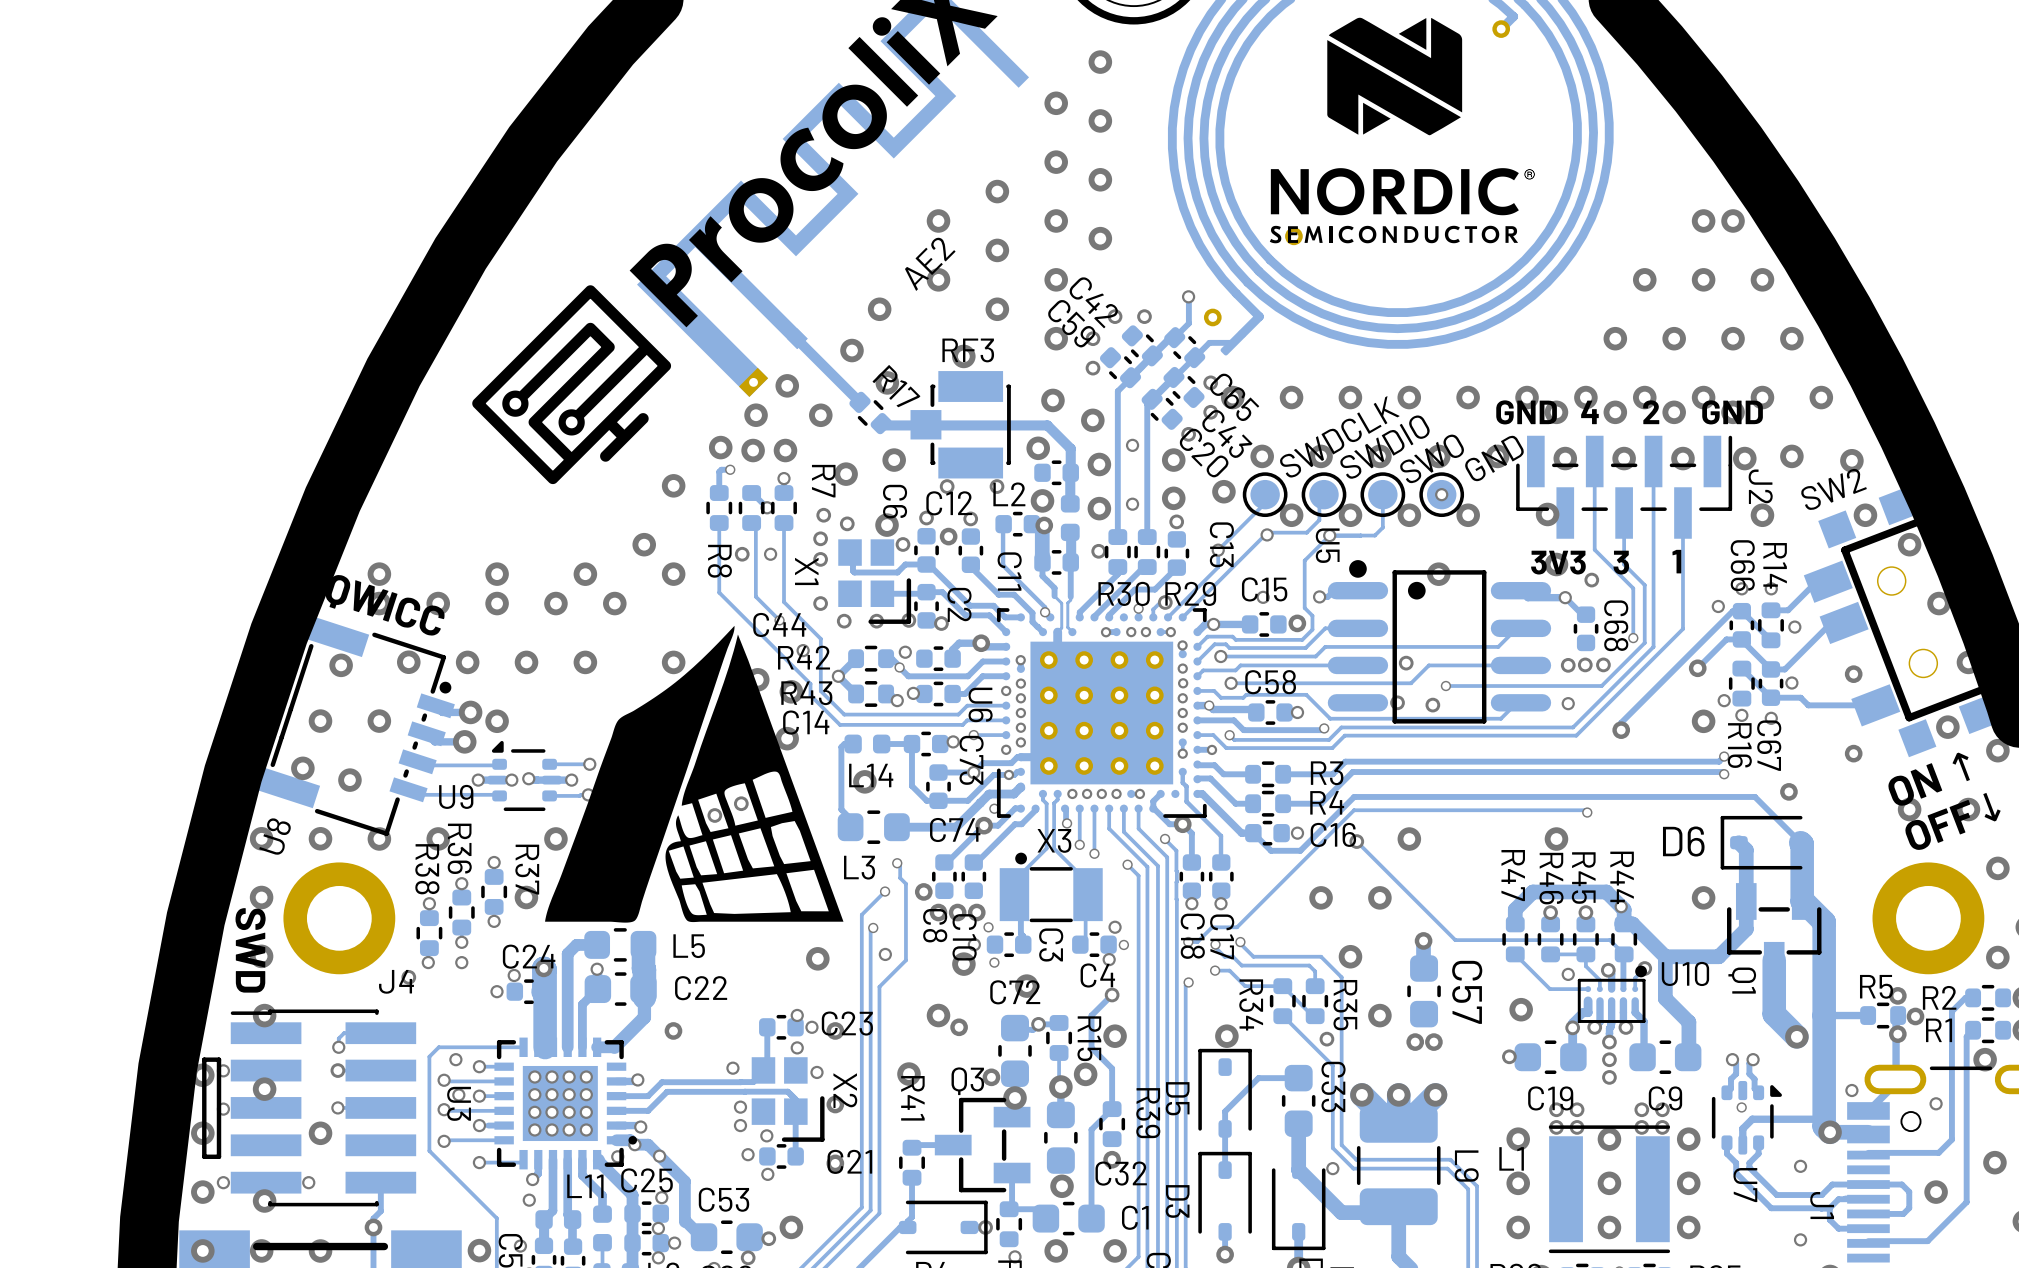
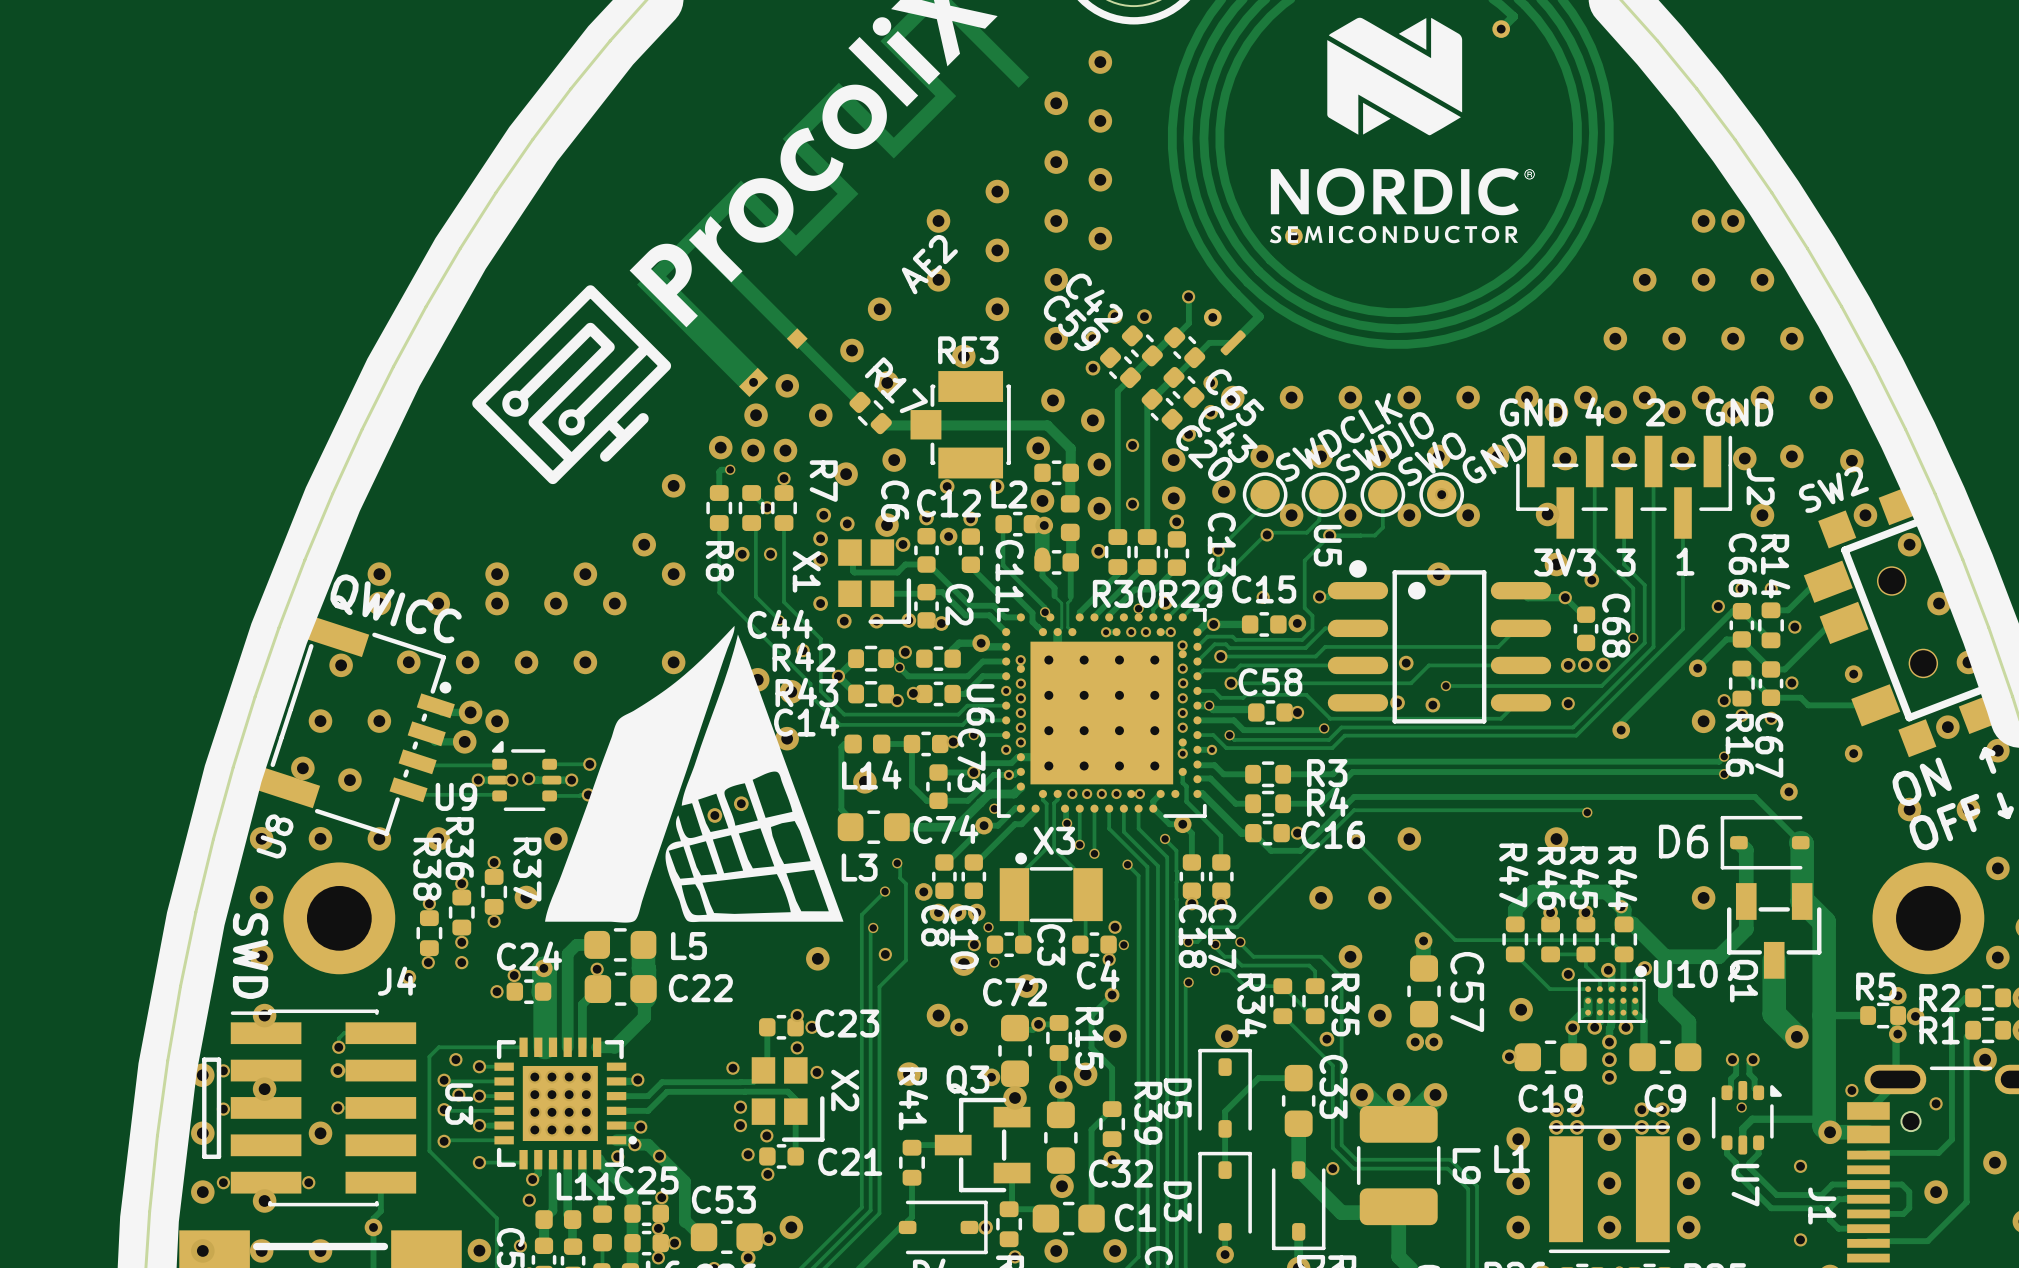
via: (673, 1030) -> none
via: (835, 1030) -> none
via: (835, 1104) -> none
via: (835, 1163) -> none

